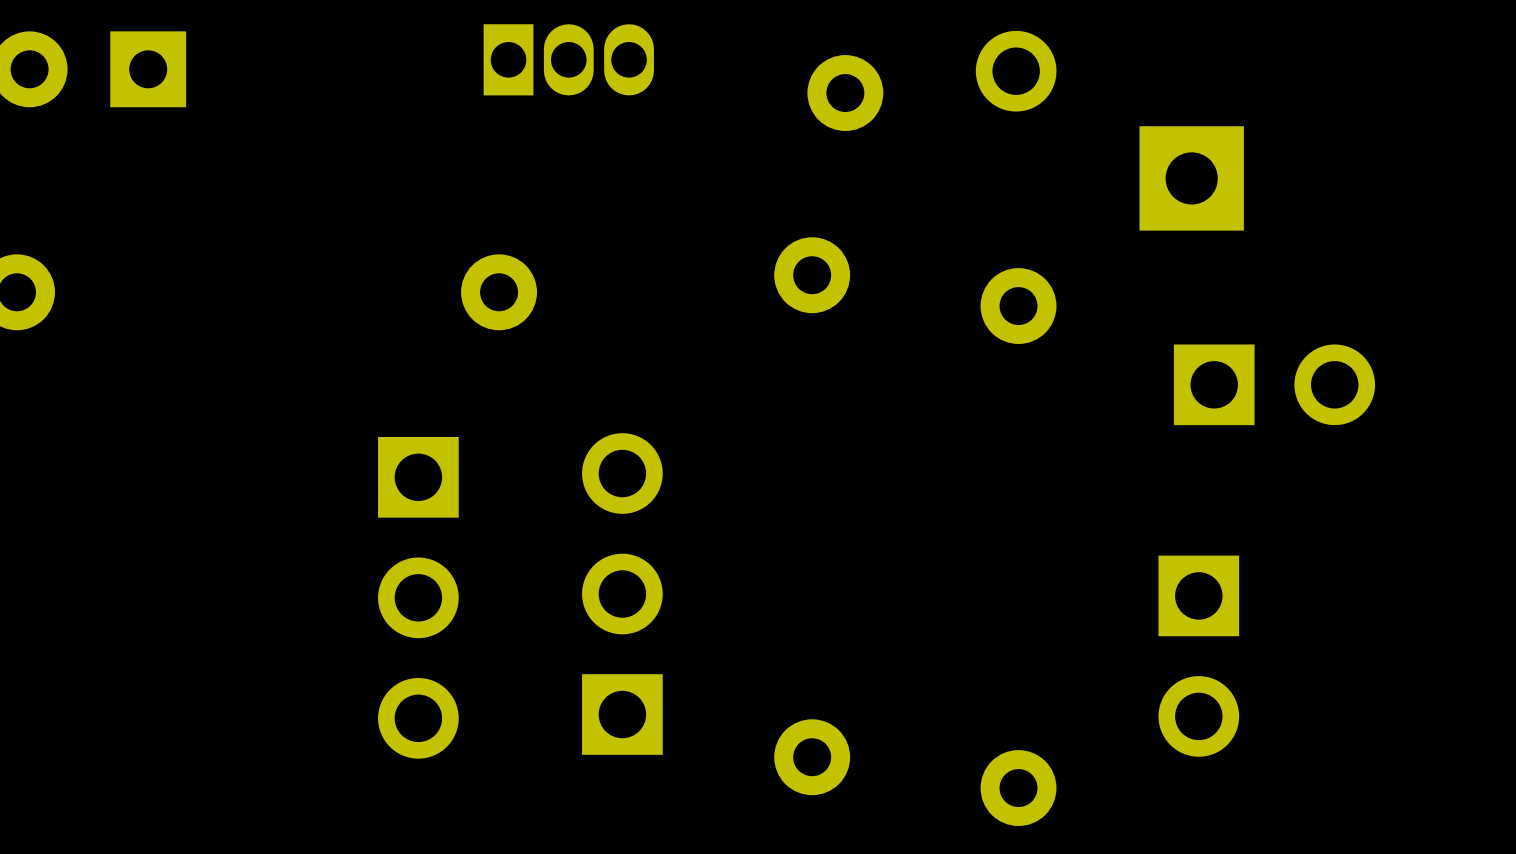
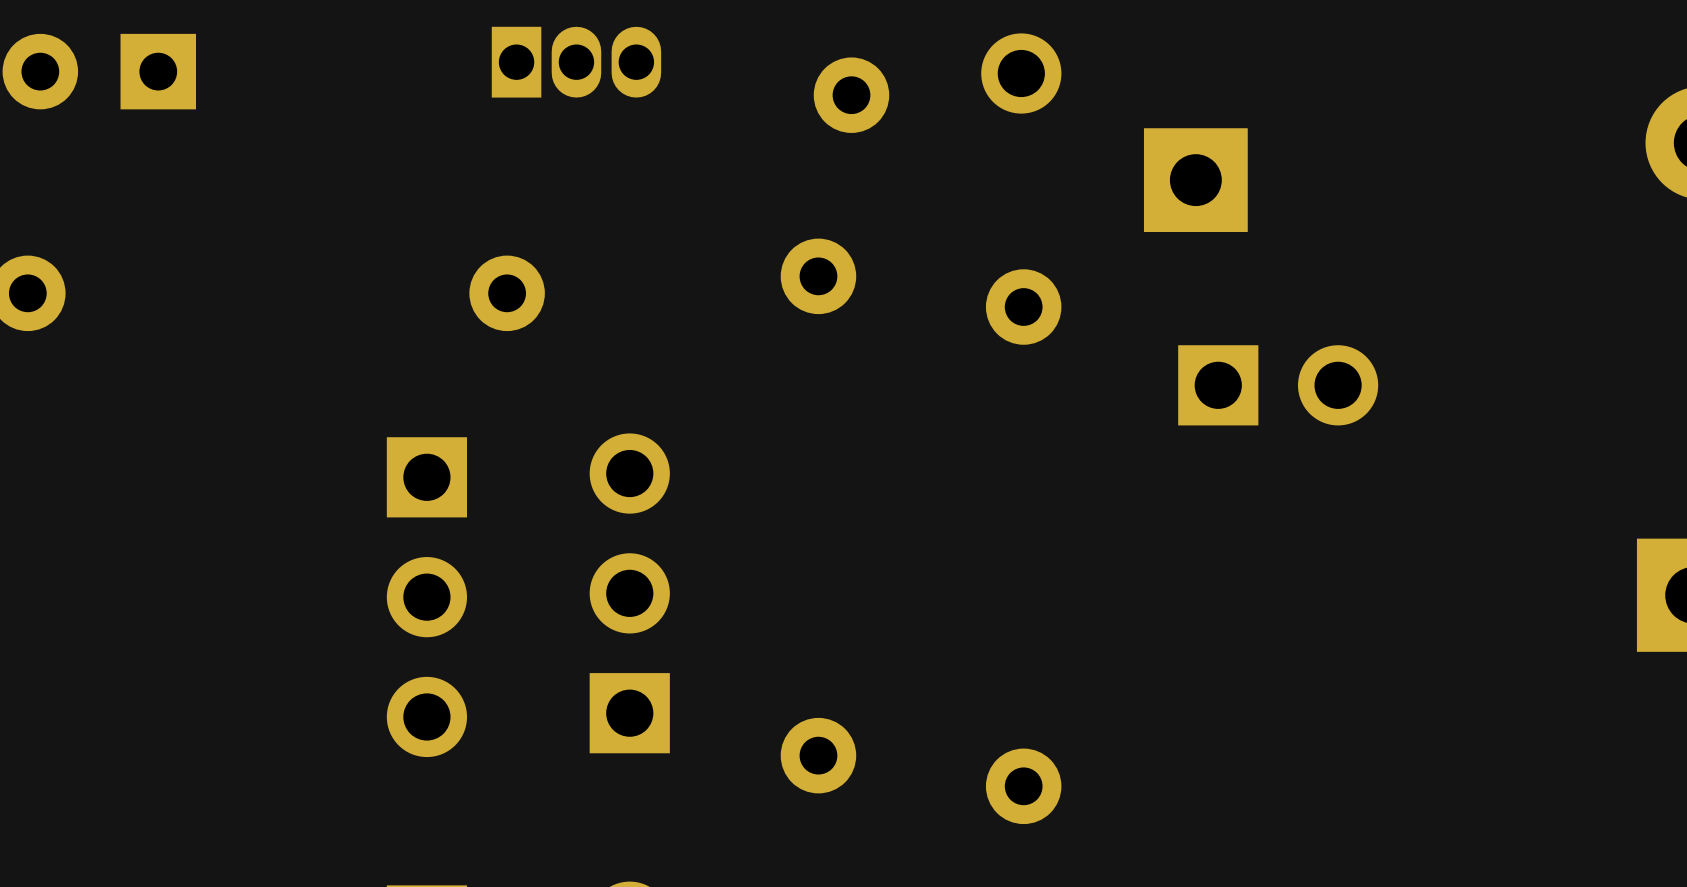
part: (1198, 656) -> none

